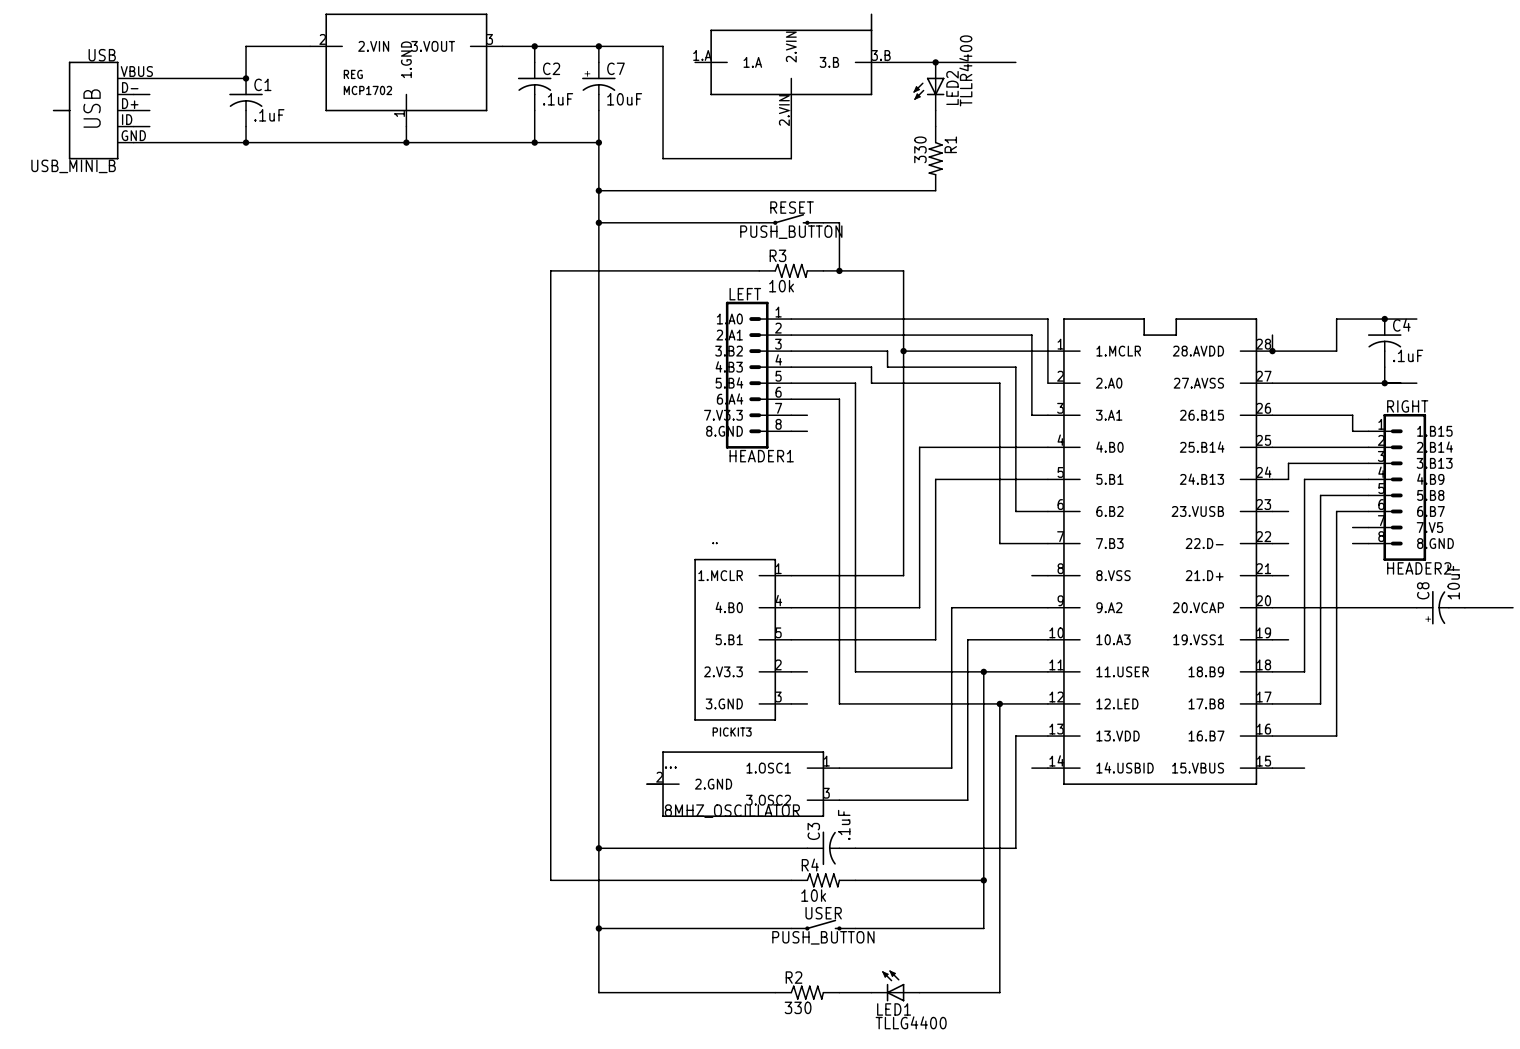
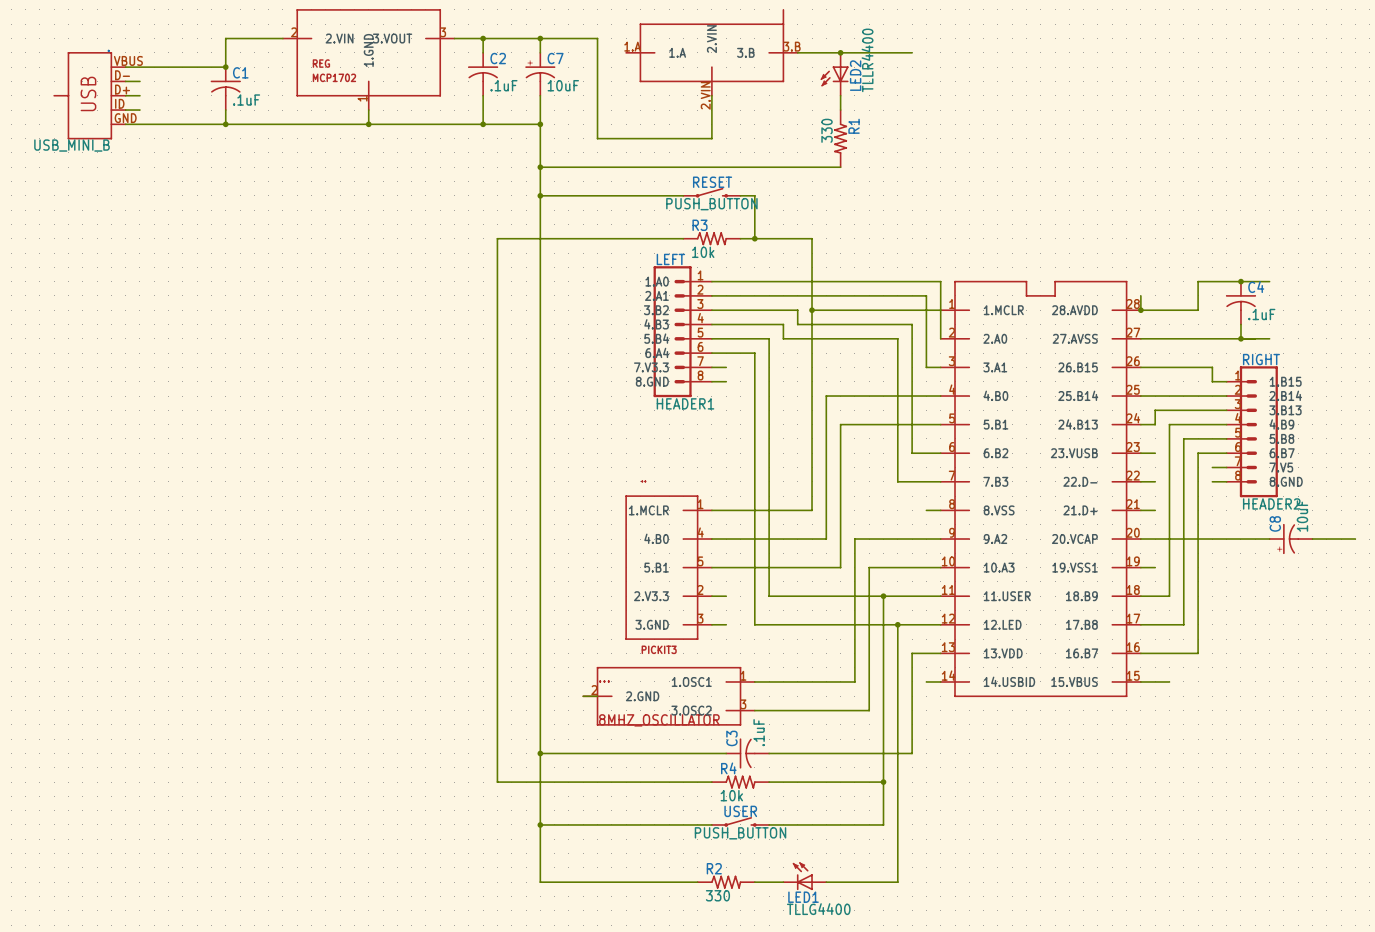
USB name: USB (102, 55) -> . (108, 50)

